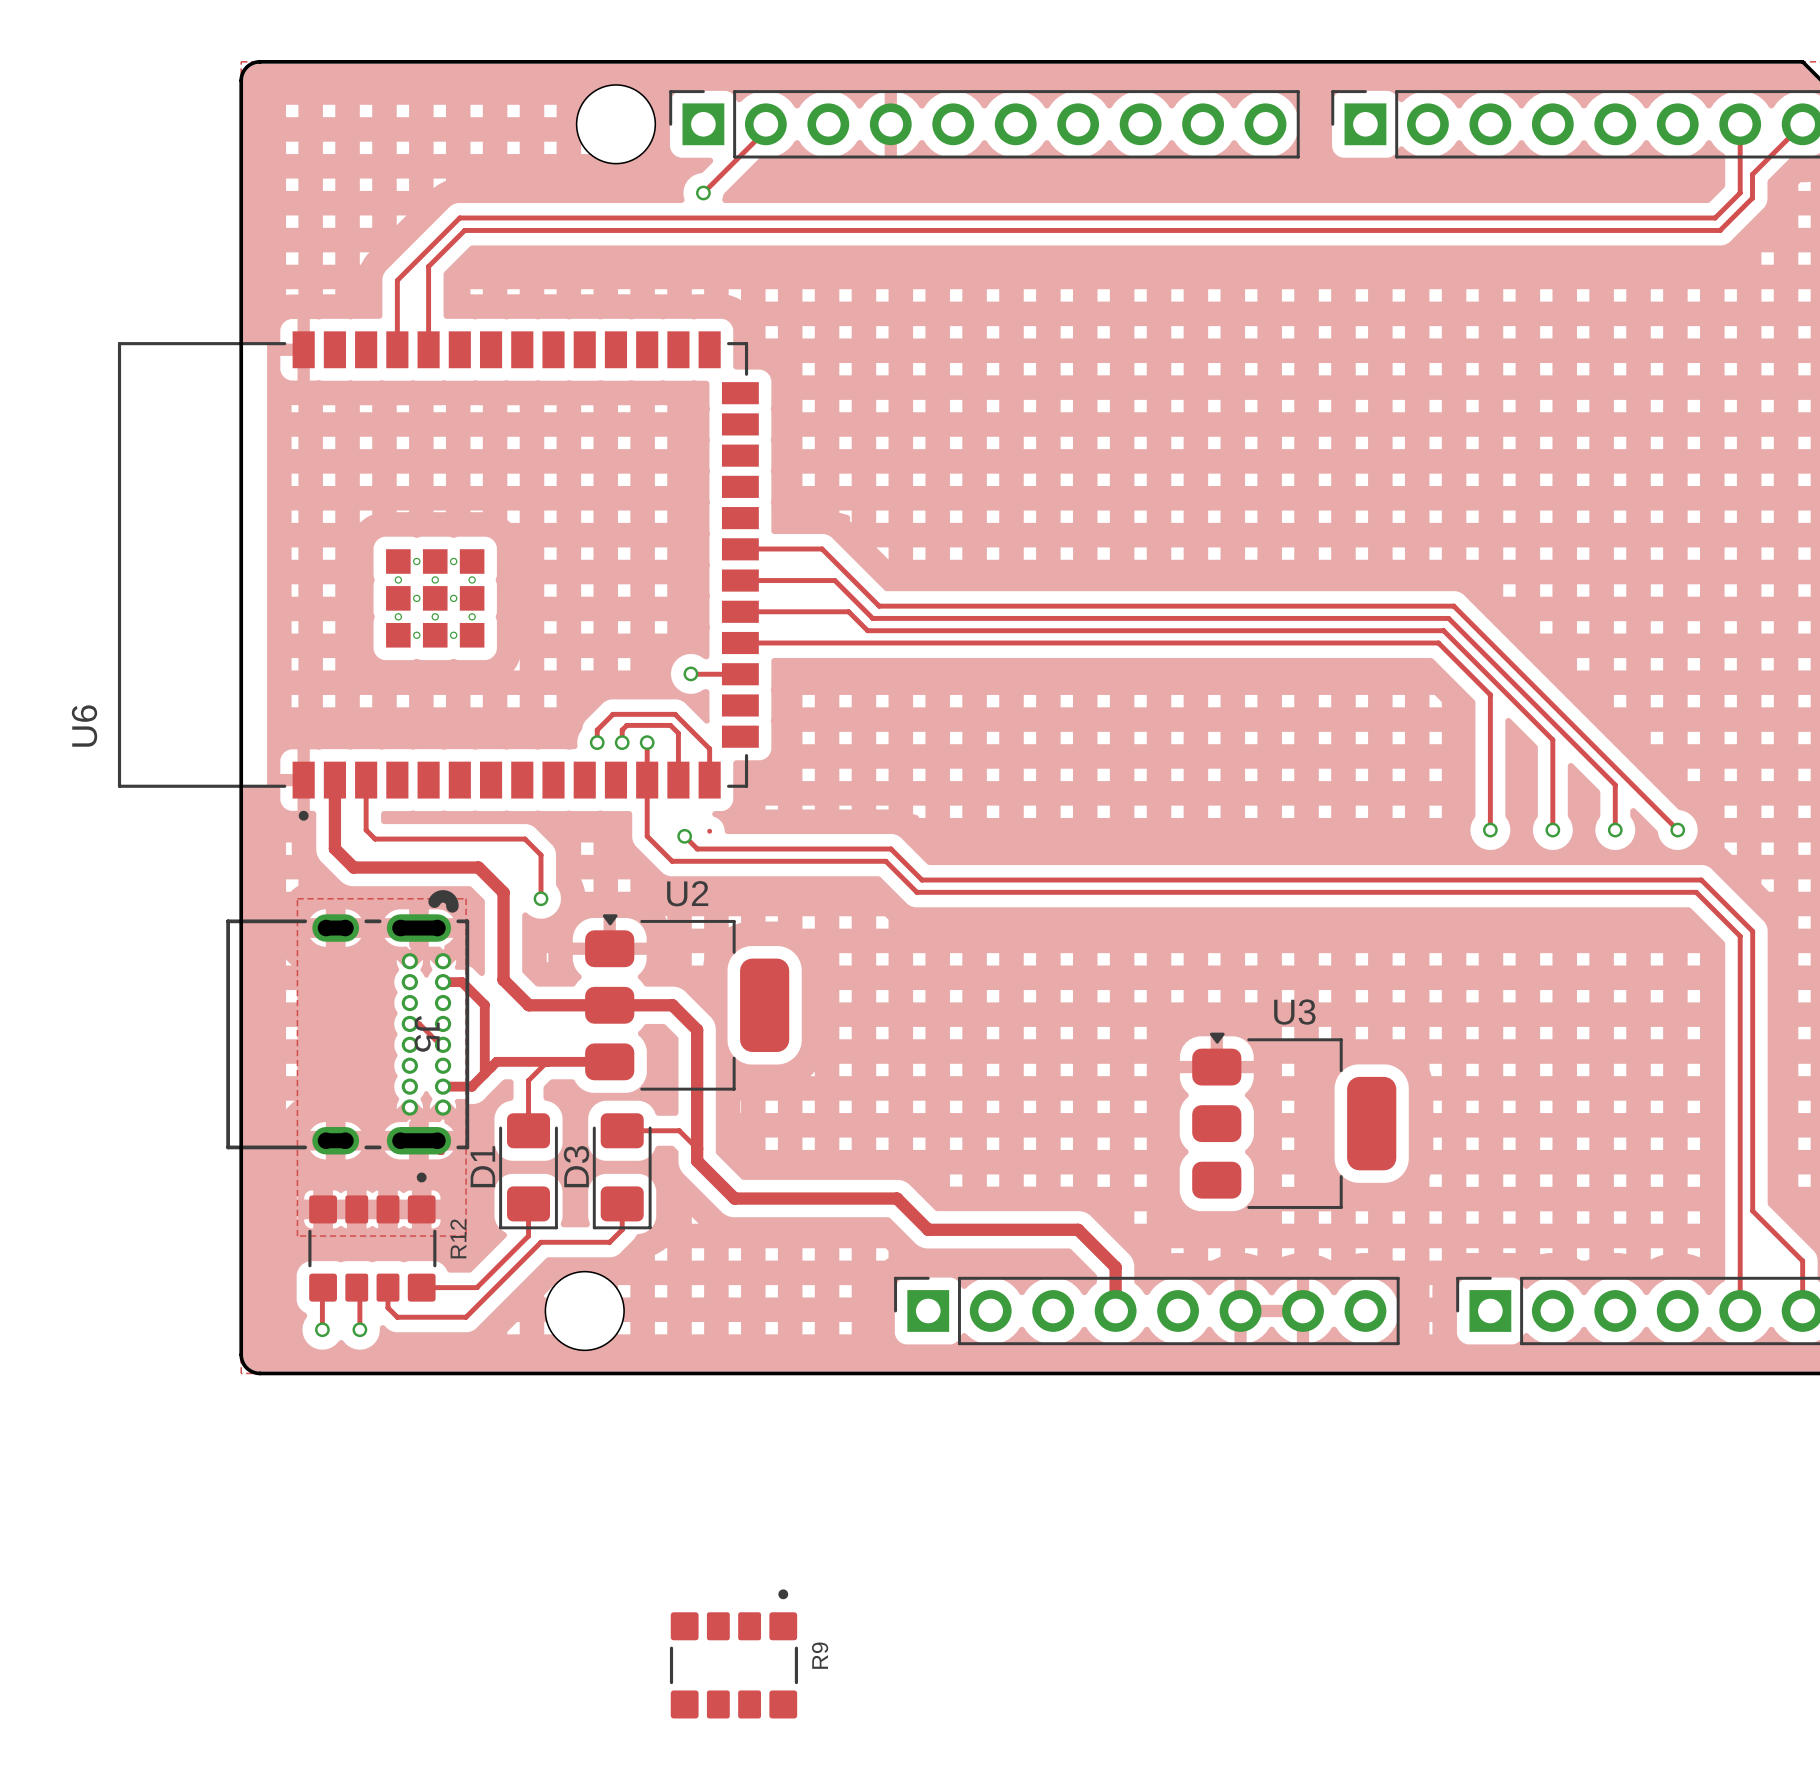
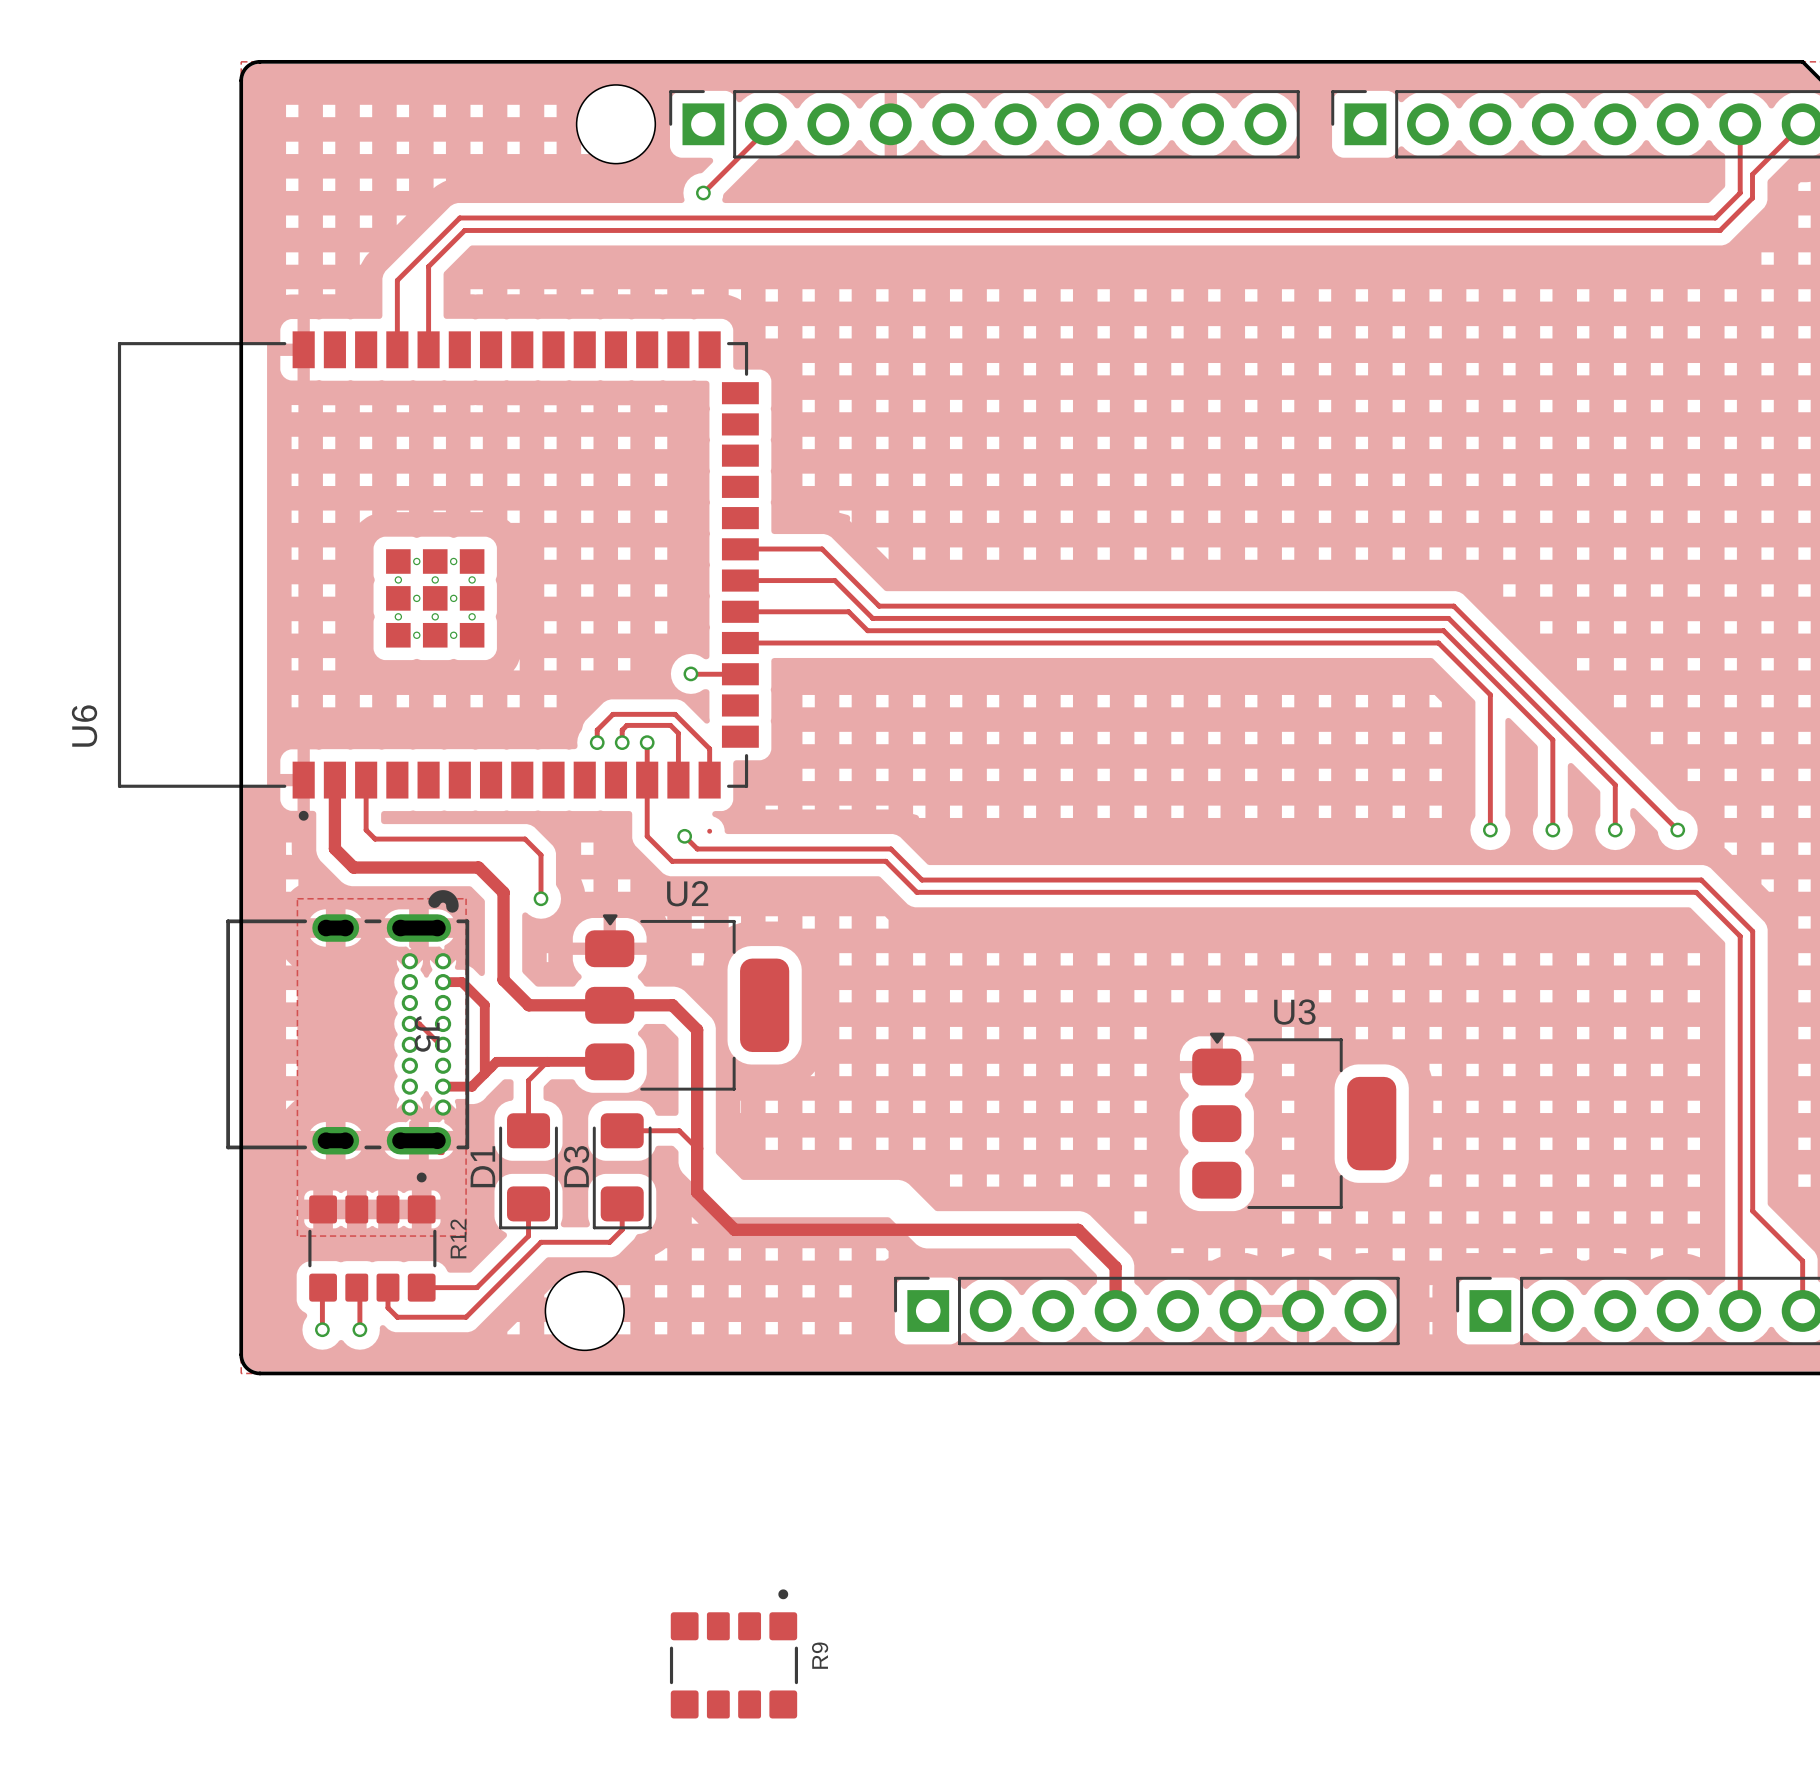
track: (697, 1161) (734, 1198) (897, 1198) (928, 1229) -> (697, 1161) (697, 1192) (734, 1229) (928, 1229)

